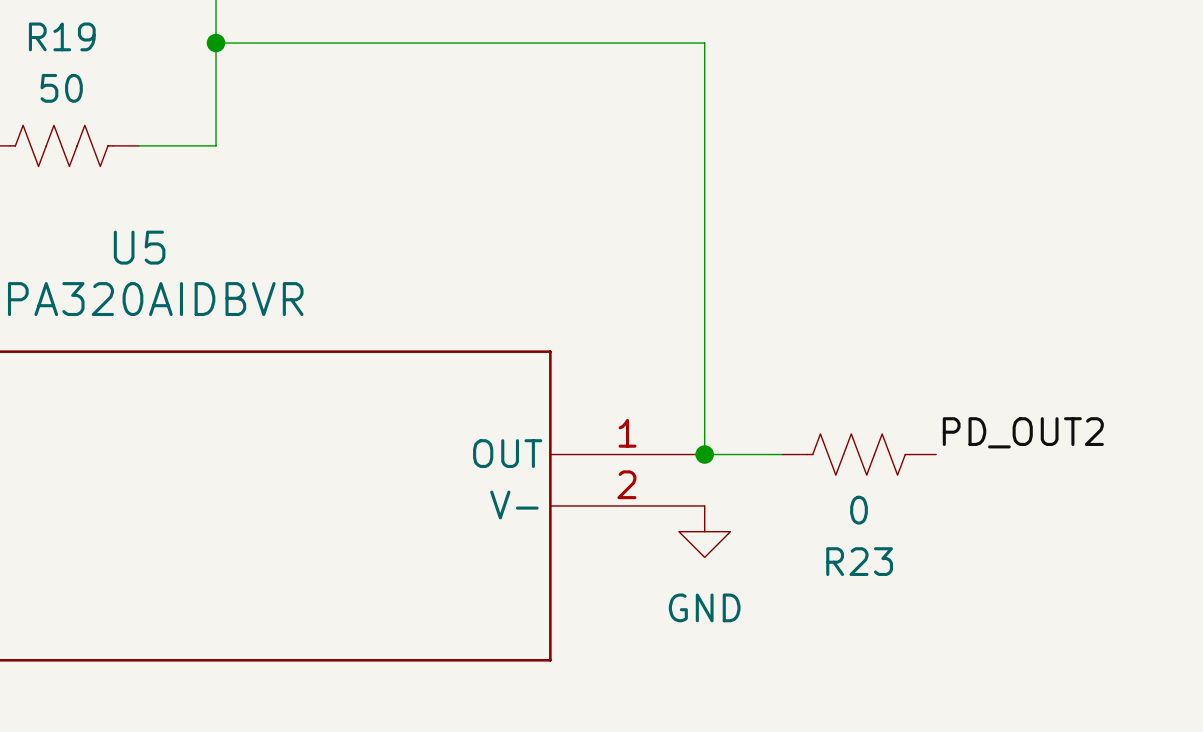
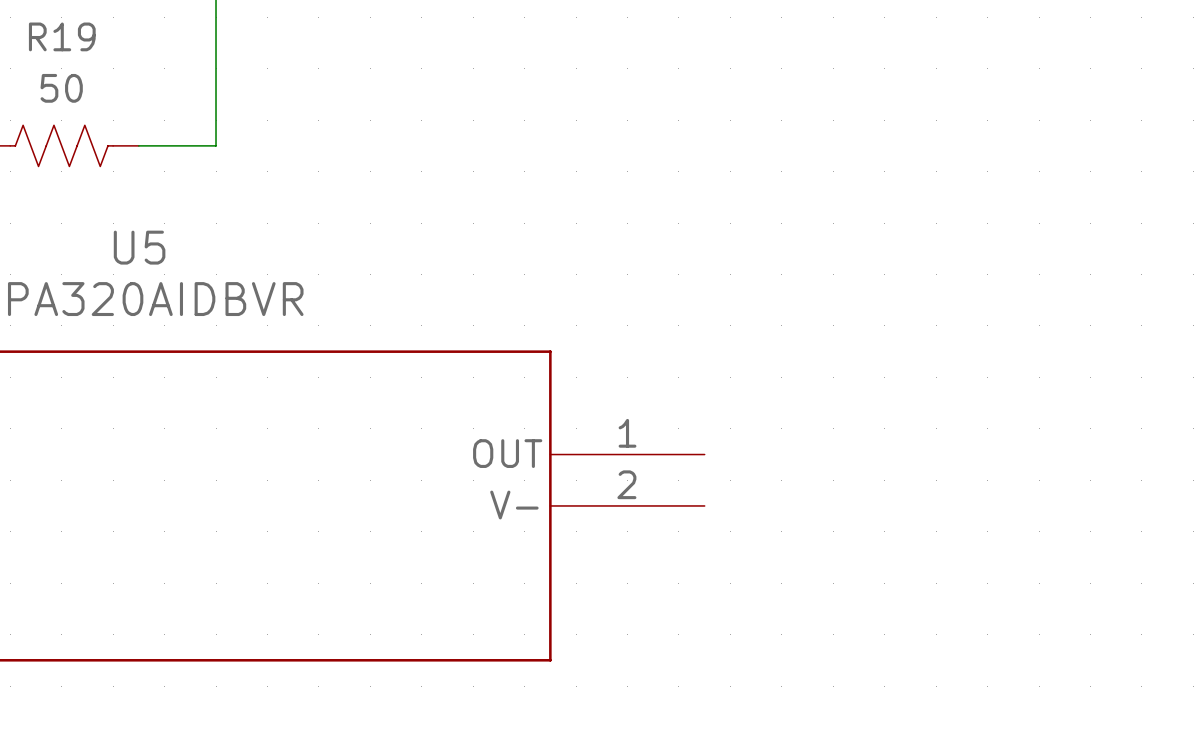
wire: (216, 43) (704, 43) (704, 454) (781, 454) -> none
junction: (216, 43) -> none
label: PD_OUT2 (1023, 432) -> none
junction: (704, 454) -> none
R23: 0 (859, 454) -> none
power symbol: GND (704, 531) -> none

